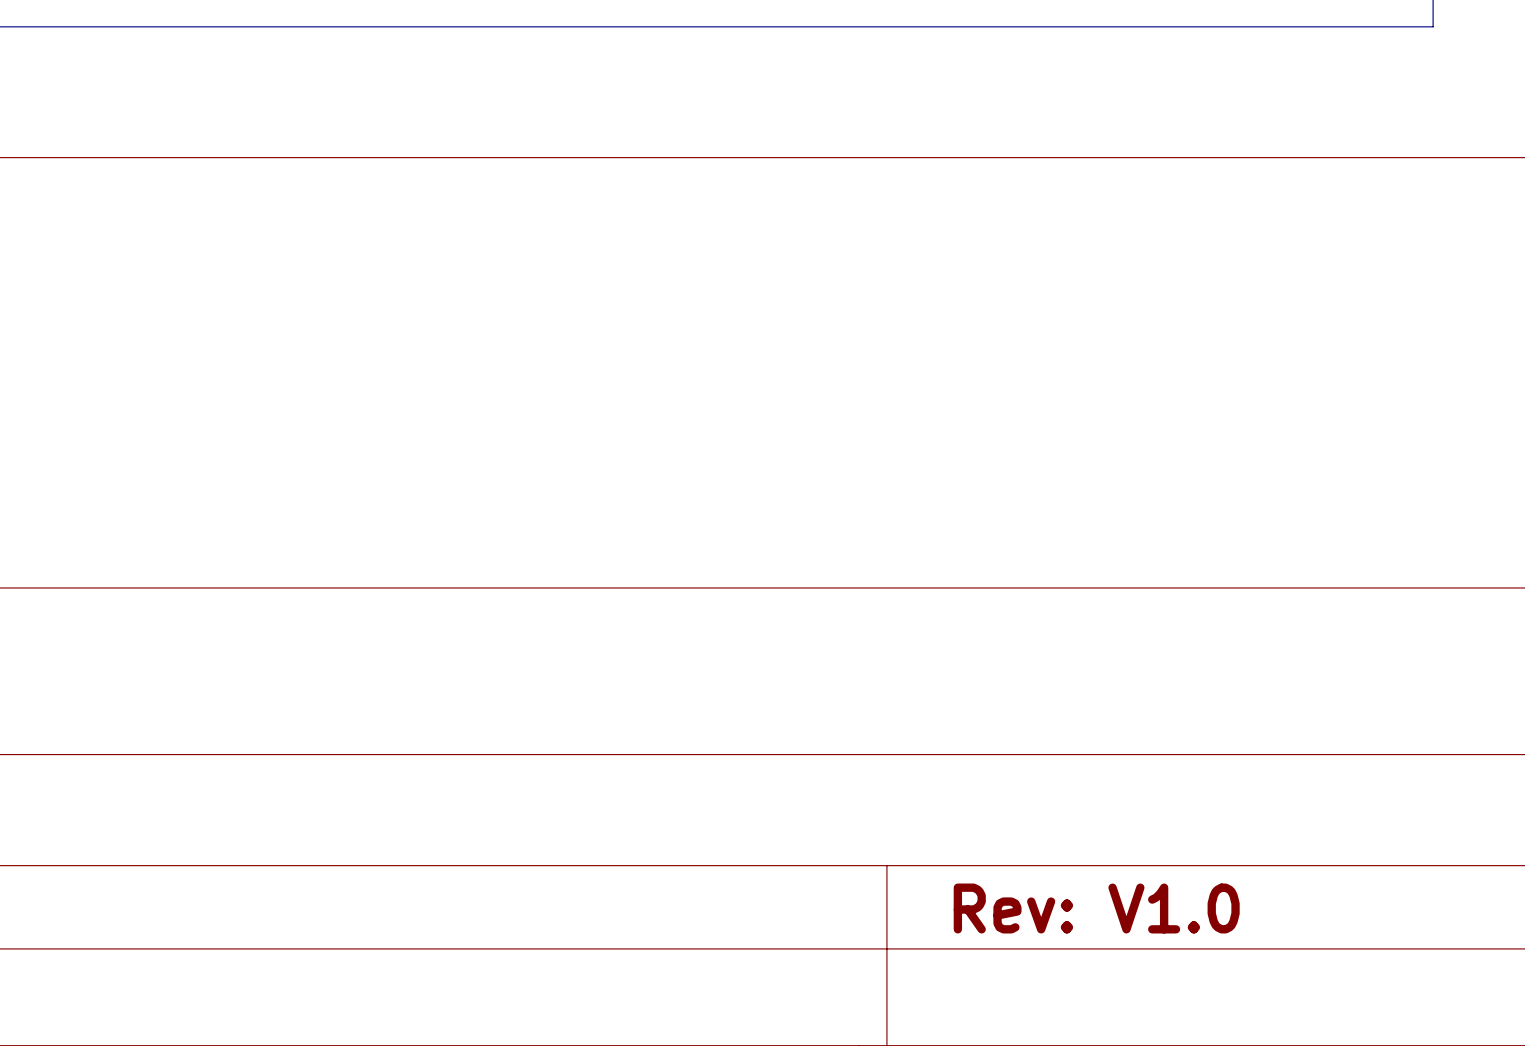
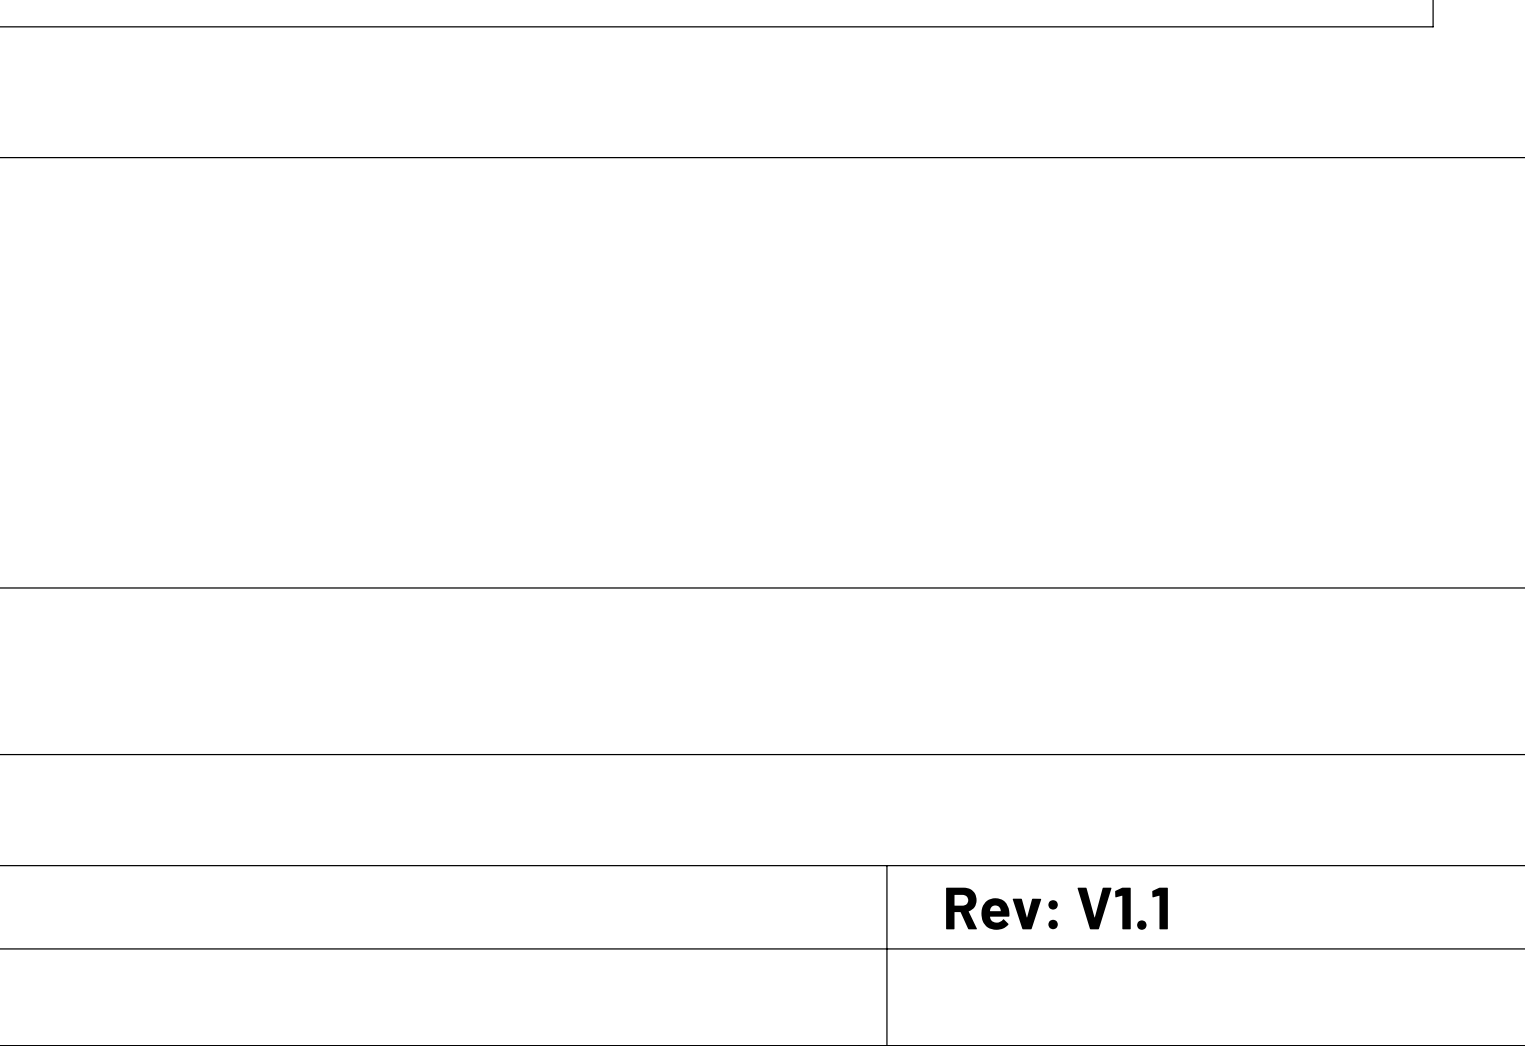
title block: Rev: V1.0 (1096, 908) -> Rev: V1.1 (1056, 908)

